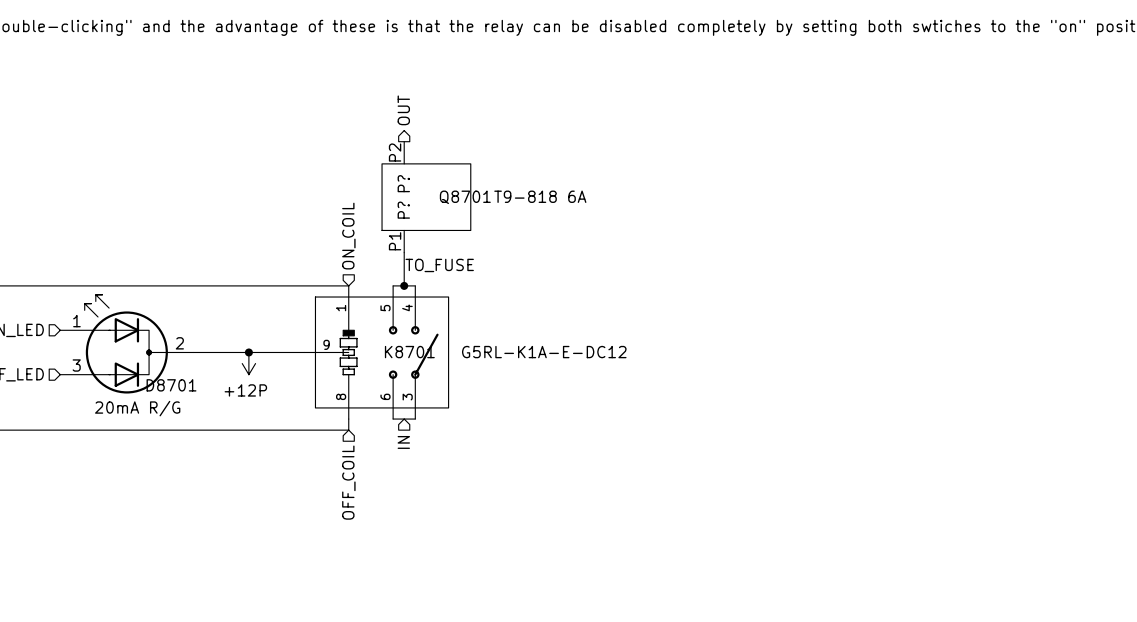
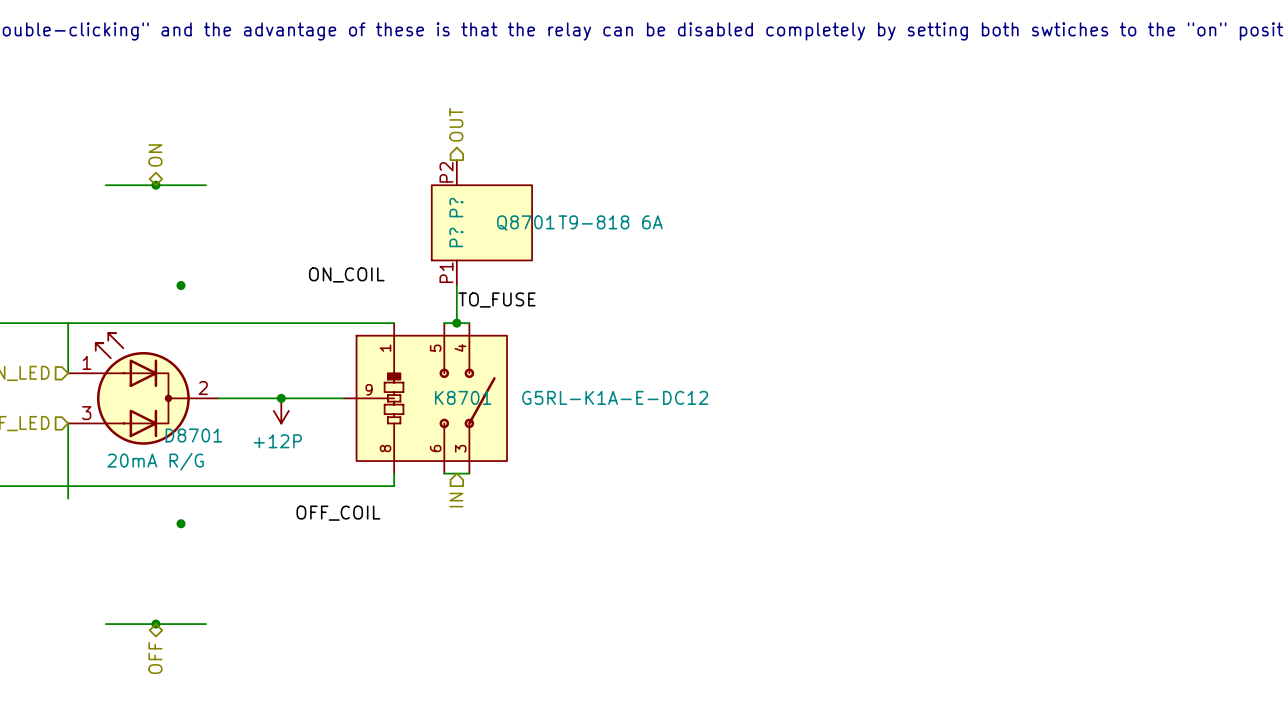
hierarchical label: none -> ON (155, 155)
wire: none -> (105, 185) (206, 185)
junction: none -> (155, 185)
hierarchical label: ON_COIL (348, 236) -> none
label: none -> ON_COIL (346, 274)
junction: none -> (181, 285)
wire: none -> (68, 323) (68, 373)
wire: none -> (68, 423) (68, 498)
label: none -> OFF_COIL (338, 513)
junction: none -> (181, 523)
hierarchical label: OFF_COIL (348, 482) -> none
wire: none -> (105, 624) (206, 624)
junction: none -> (155, 624)
hierarchical label: none -> OFF (155, 657)

